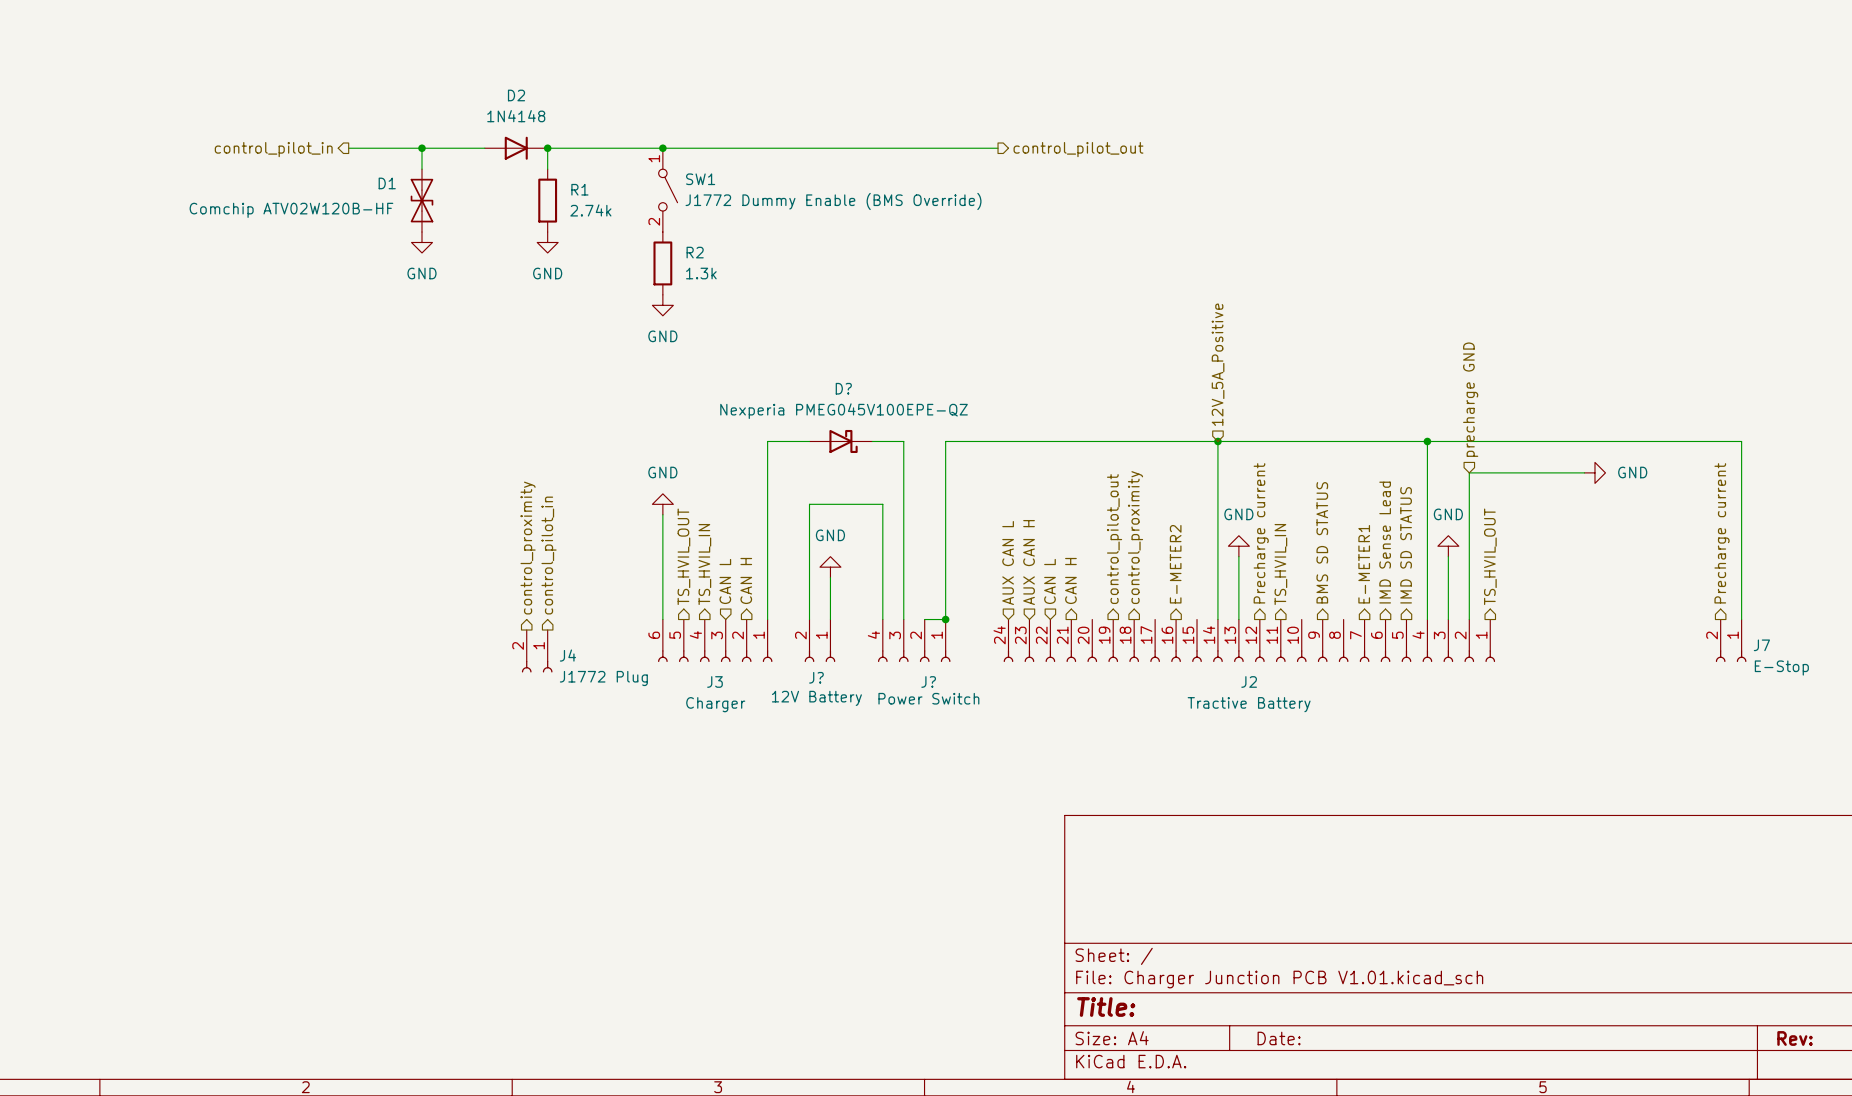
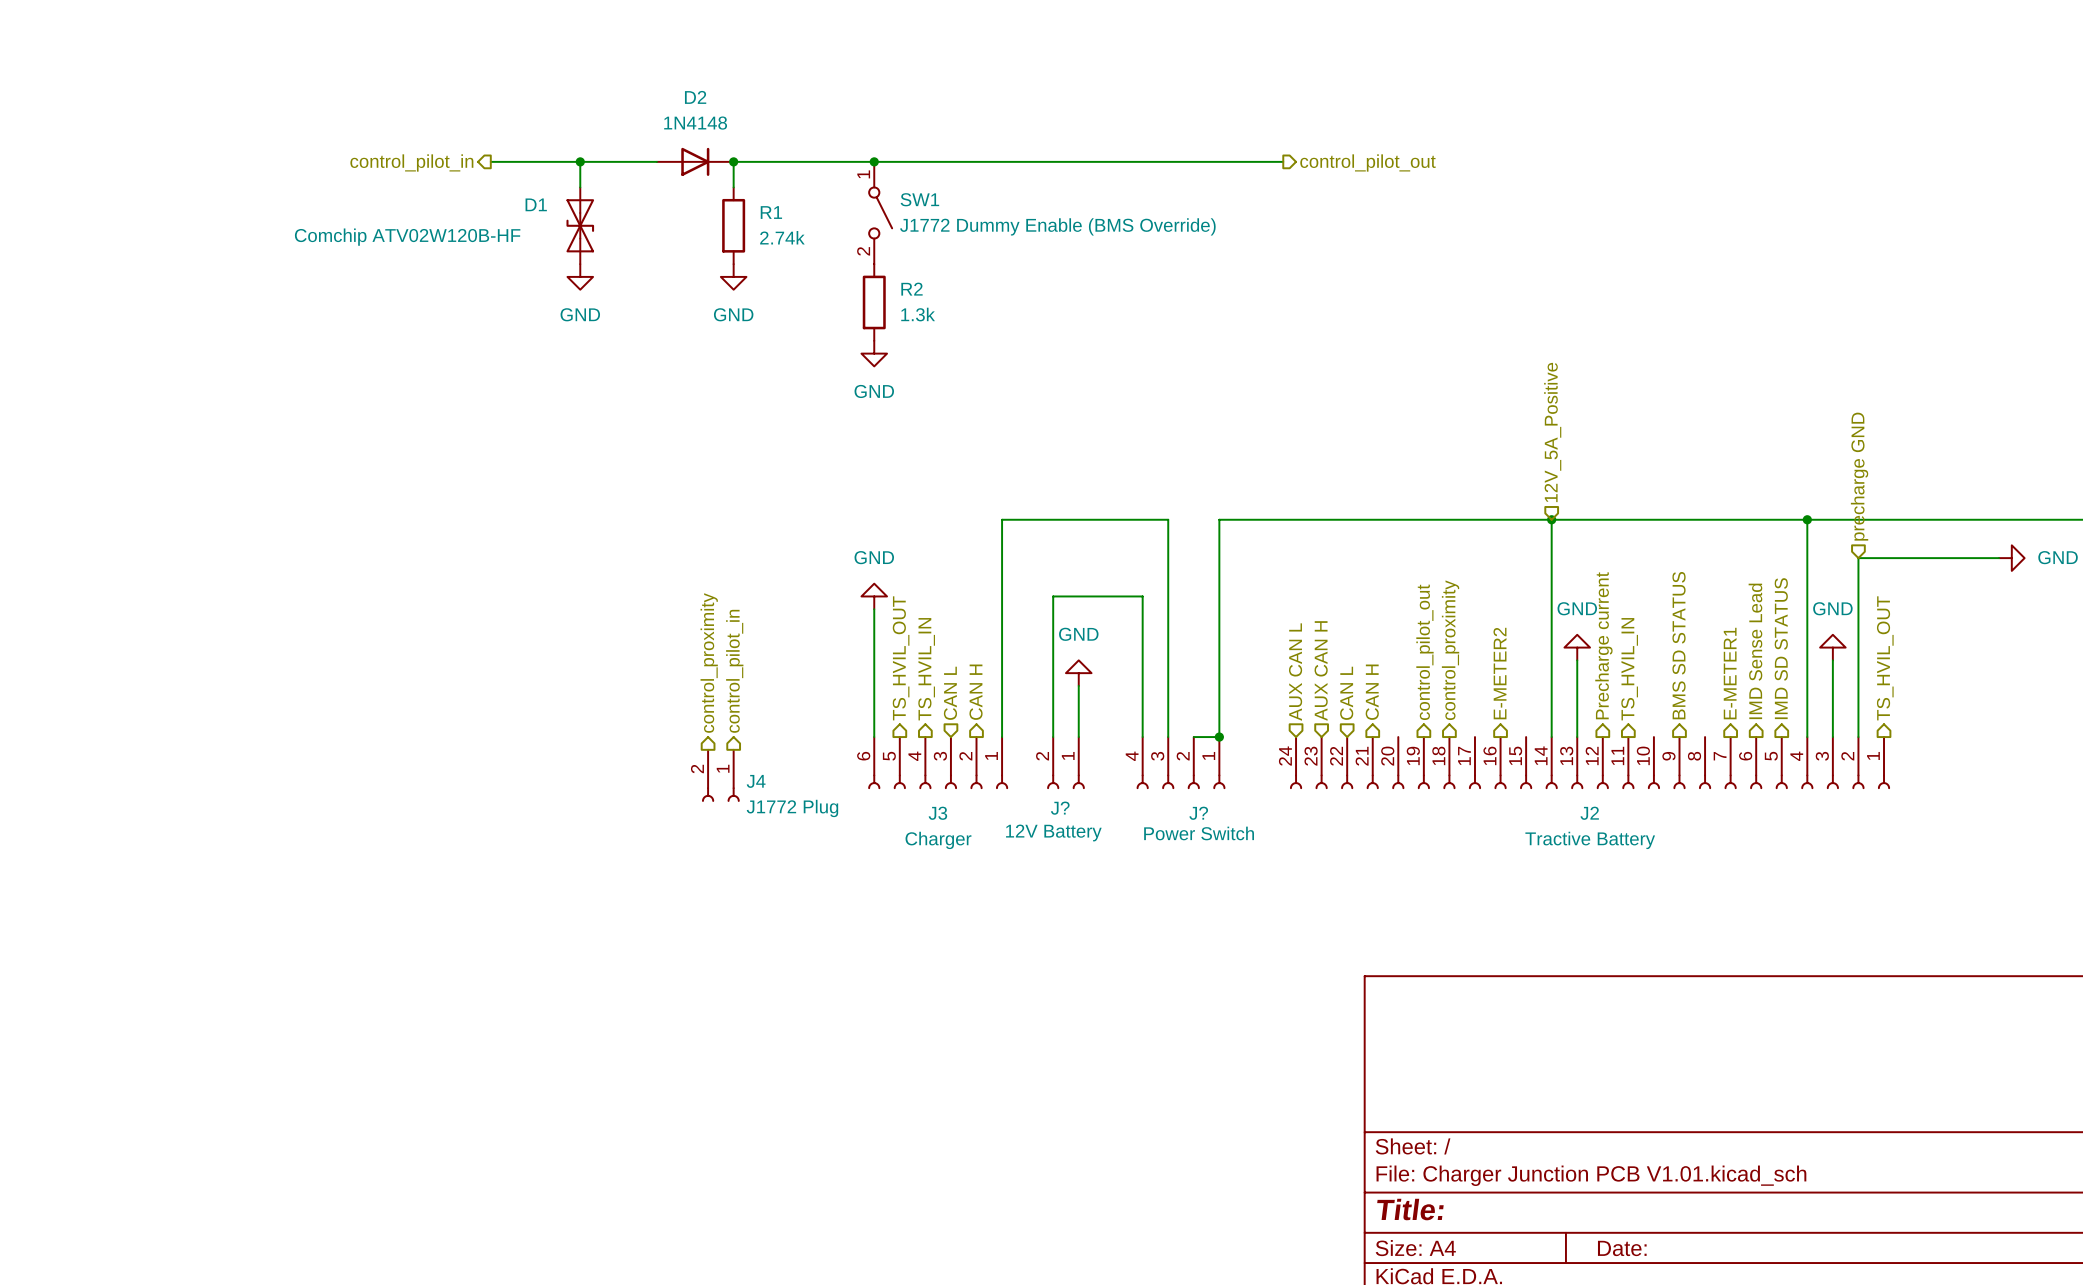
D?: Nexperia PMEG045V100EPE-QZ (840, 441) -> none

